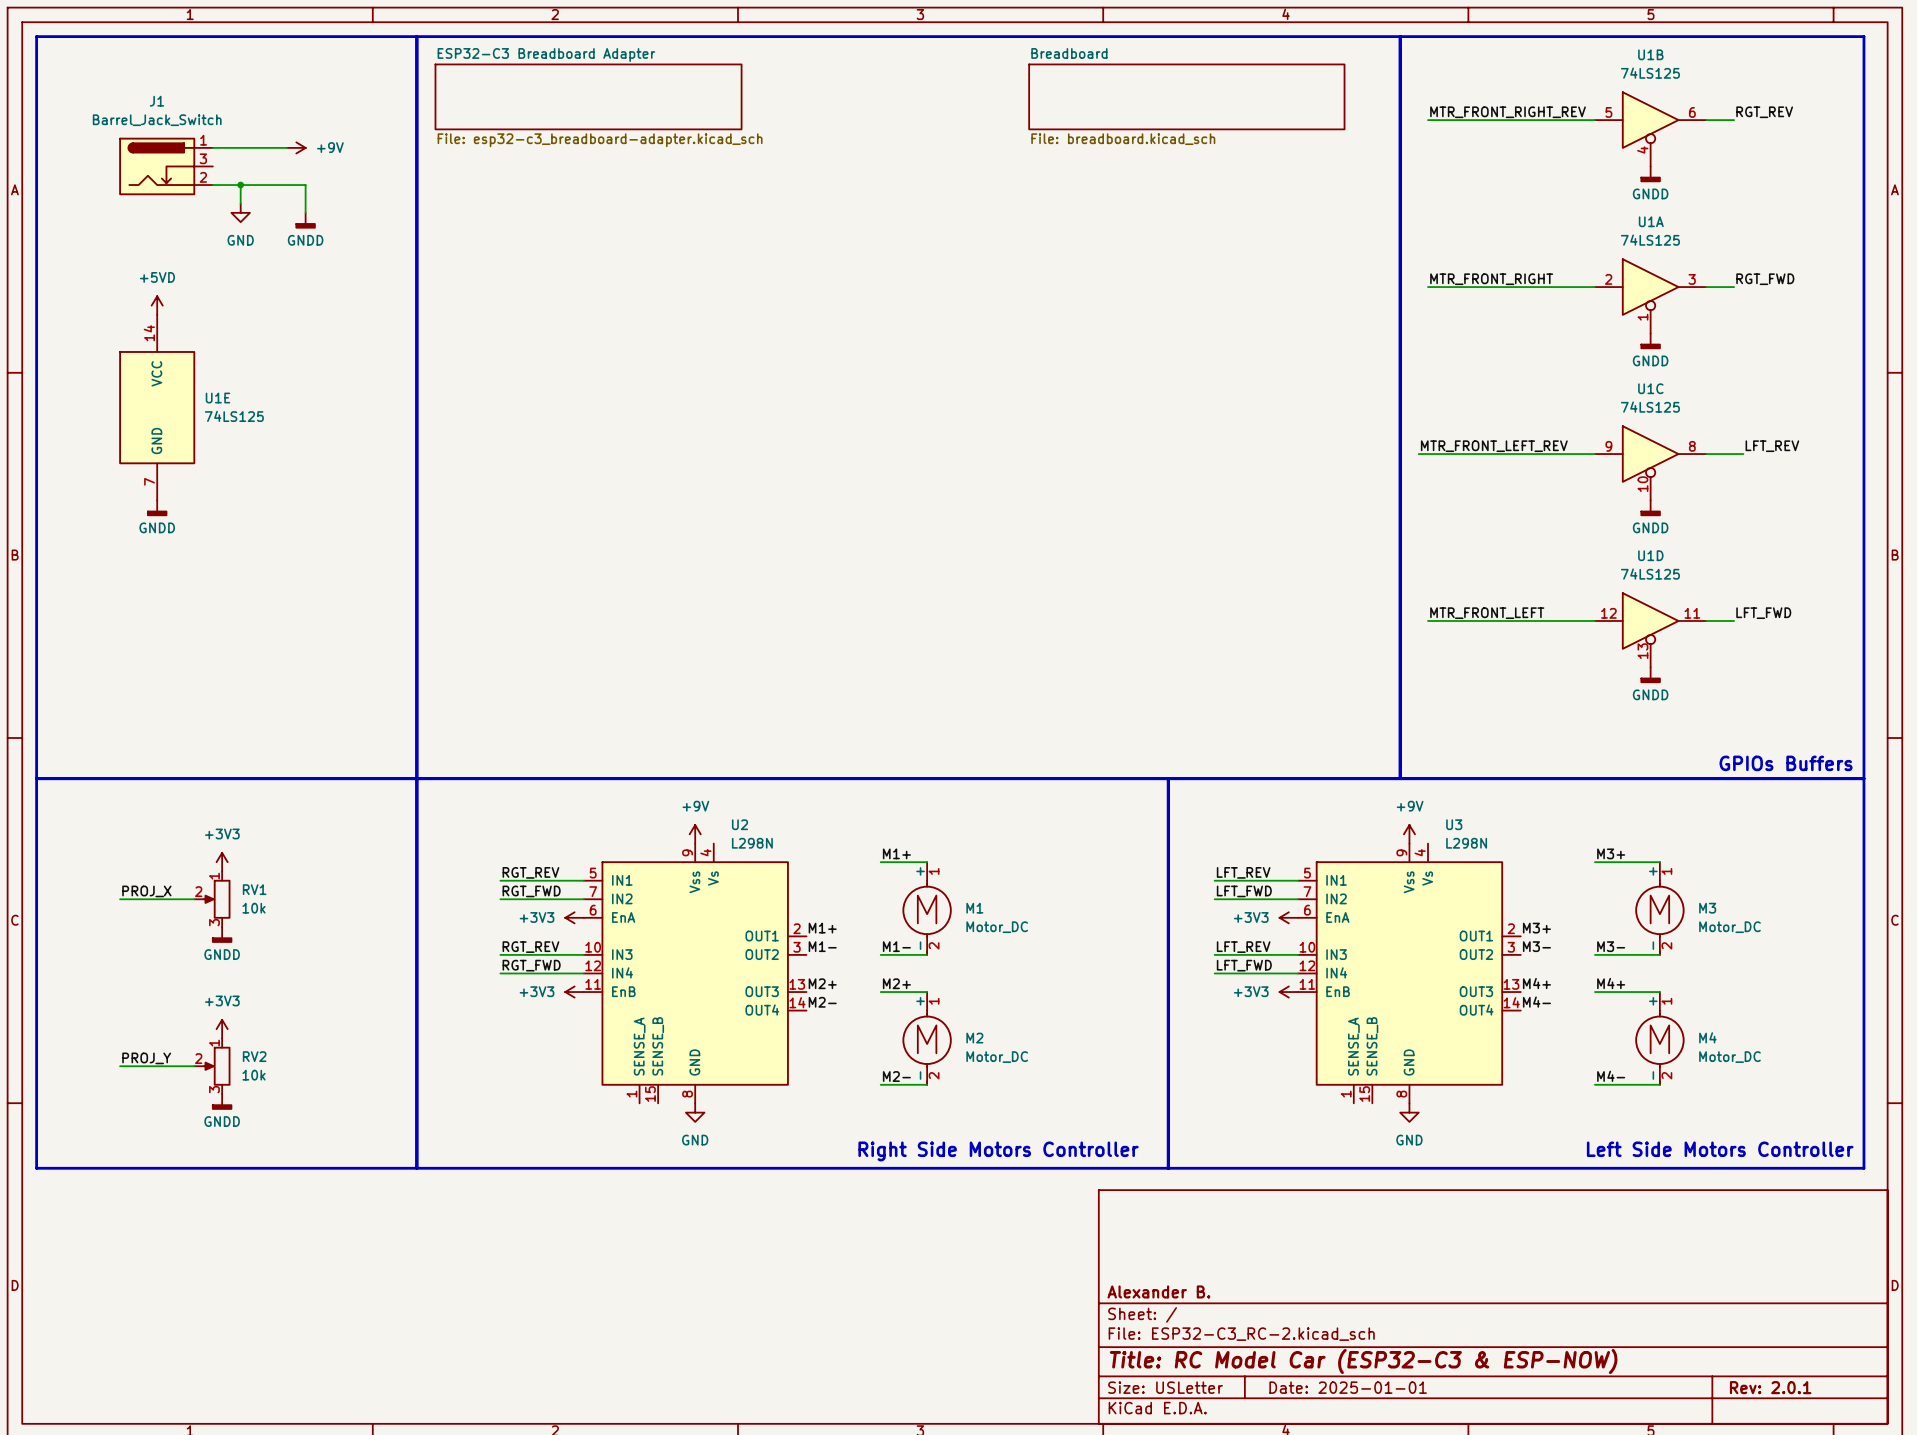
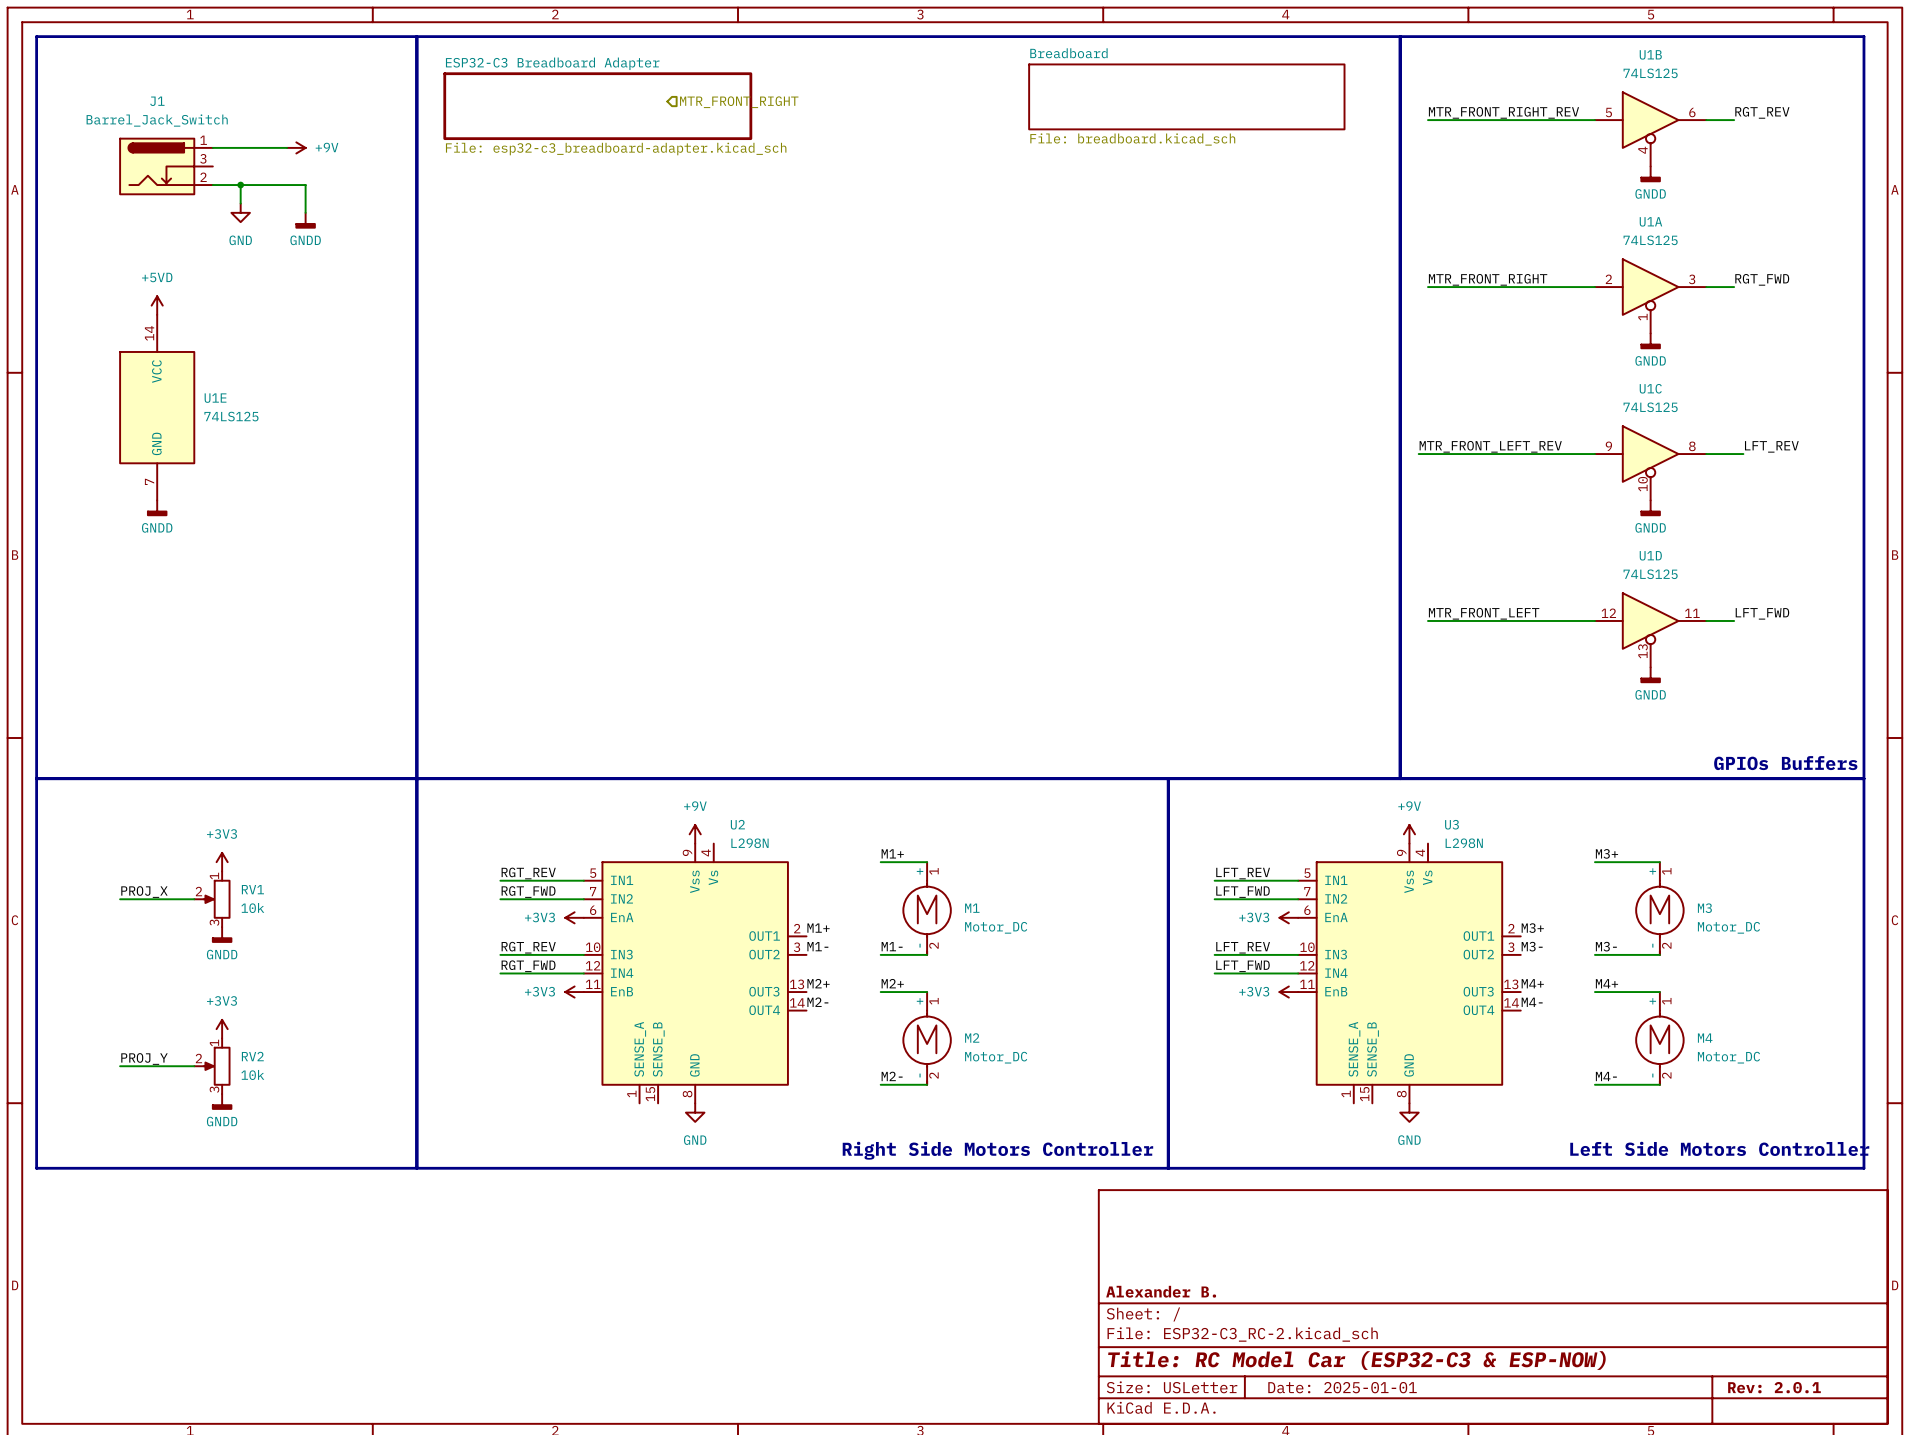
sheet ESP32-C3 Breadboard Adapter shape: [434, 63, 743, 130] -> [443, 72, 753, 141]
hierarchical label: none -> MTR_FRONT_RIGHT (739, 102)

